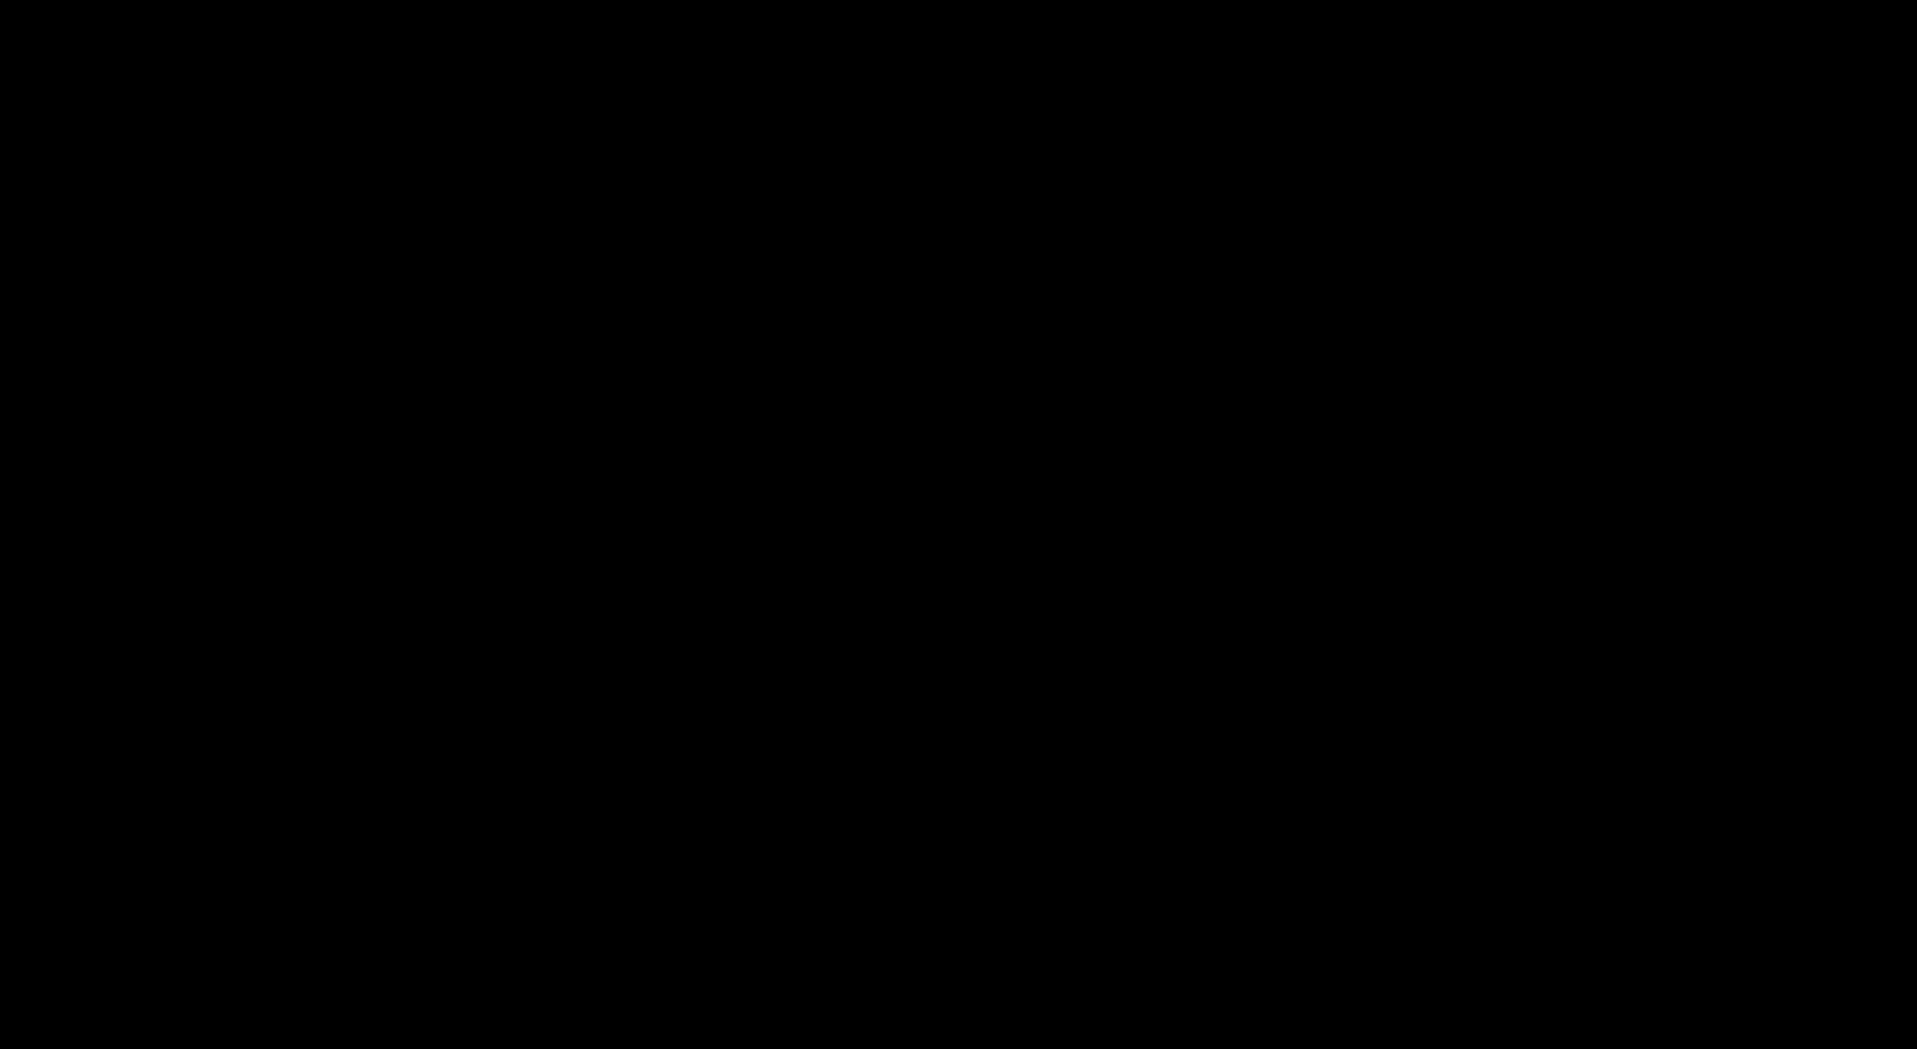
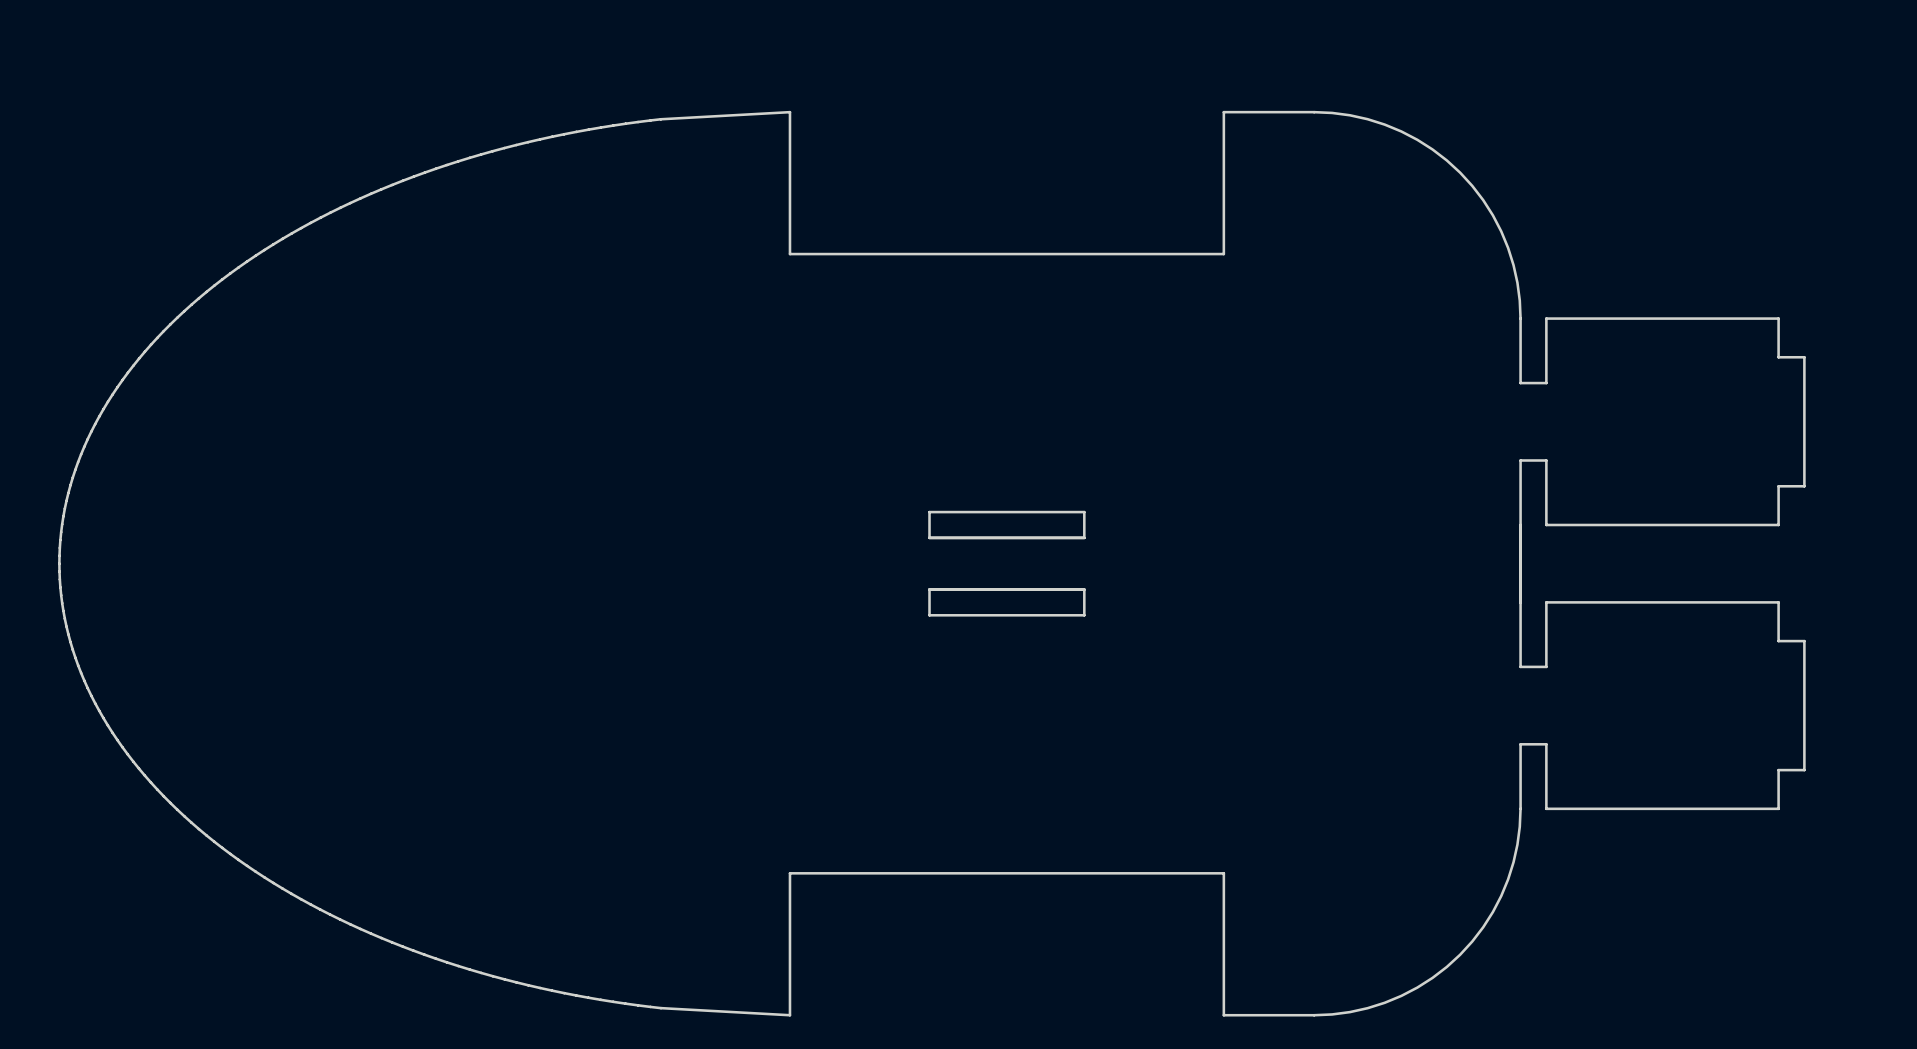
board edge: none -> (789, 112) (789, 254) (1223, 254) (1223, 112) (1332, 112) (1349, 115) (1384, 124) (1417, 139) (1446, 160) (1472, 185) (1483, 200) (1501, 231) (1508, 247) (1517, 282) (1520, 318) (1520, 383) (1546, 383) (1546, 318) (1778, 318) (1778, 357) (1804, 357) (1804, 486) (1778, 486) (1778, 524) (1546, 524) (1546, 460) (1520, 460) (1520, 666) (1546, 666) (1546, 602) (1778, 602) (1778, 641) (1804, 641) (1804, 770) (1778, 770) (1778, 808) (1546, 808) (1546, 744) (1520, 744) (1520, 808) (1517, 844) (1508, 879) (1501, 896) (1483, 927) (1472, 941) (1446, 966) (1417, 987) (1384, 1002) (1367, 1008) (1332, 1014) (1314, 1015) (1223, 1015) (1223, 873) (789, 873) (789, 1015) (660, 1008) (625, 1003) (540, 988) (469, 969) (402, 946) (330, 914) (273, 882) (214, 841) (157, 789) (133, 761) (112, 732) (95, 703) (81, 672) (70, 642) (63, 610) (59, 579) (59, 547) (63, 516) (70, 485) (81, 454) (95, 424) (112, 394) (133, 365) (157, 337) (184, 311) (247, 261) (320, 217) (402, 180) (492, 151) (588, 129) (660, 119) (789, 112)
board edge: none -> (929, 512) (929, 537) (1084, 537) (1084, 512) (929, 512)
board edge: none -> (929, 589) (929, 615) (1084, 615) (1084, 589) (929, 589)

